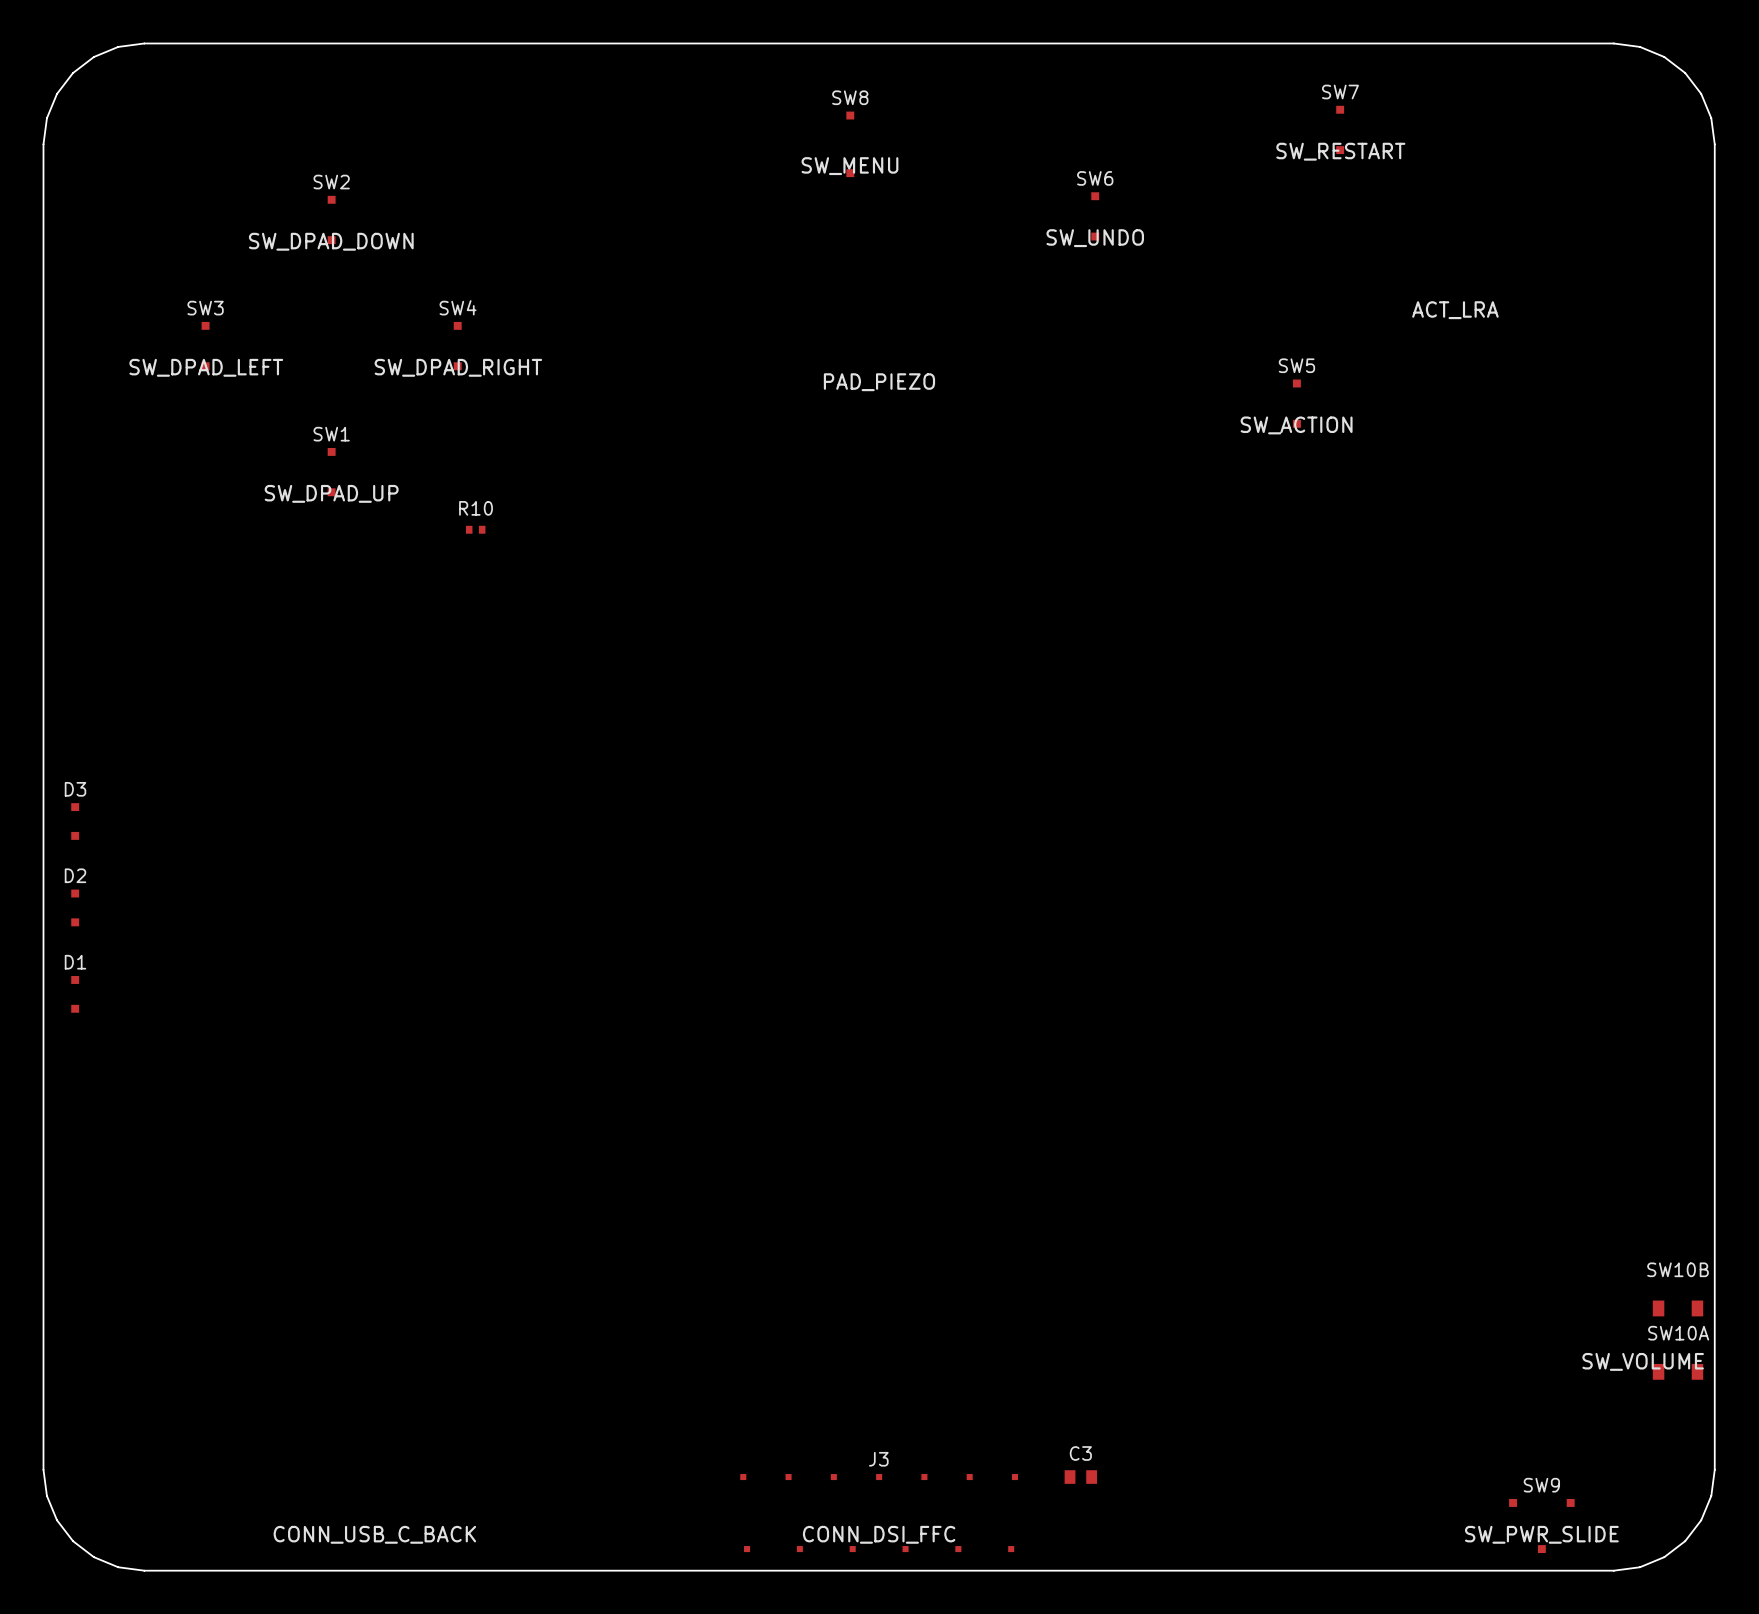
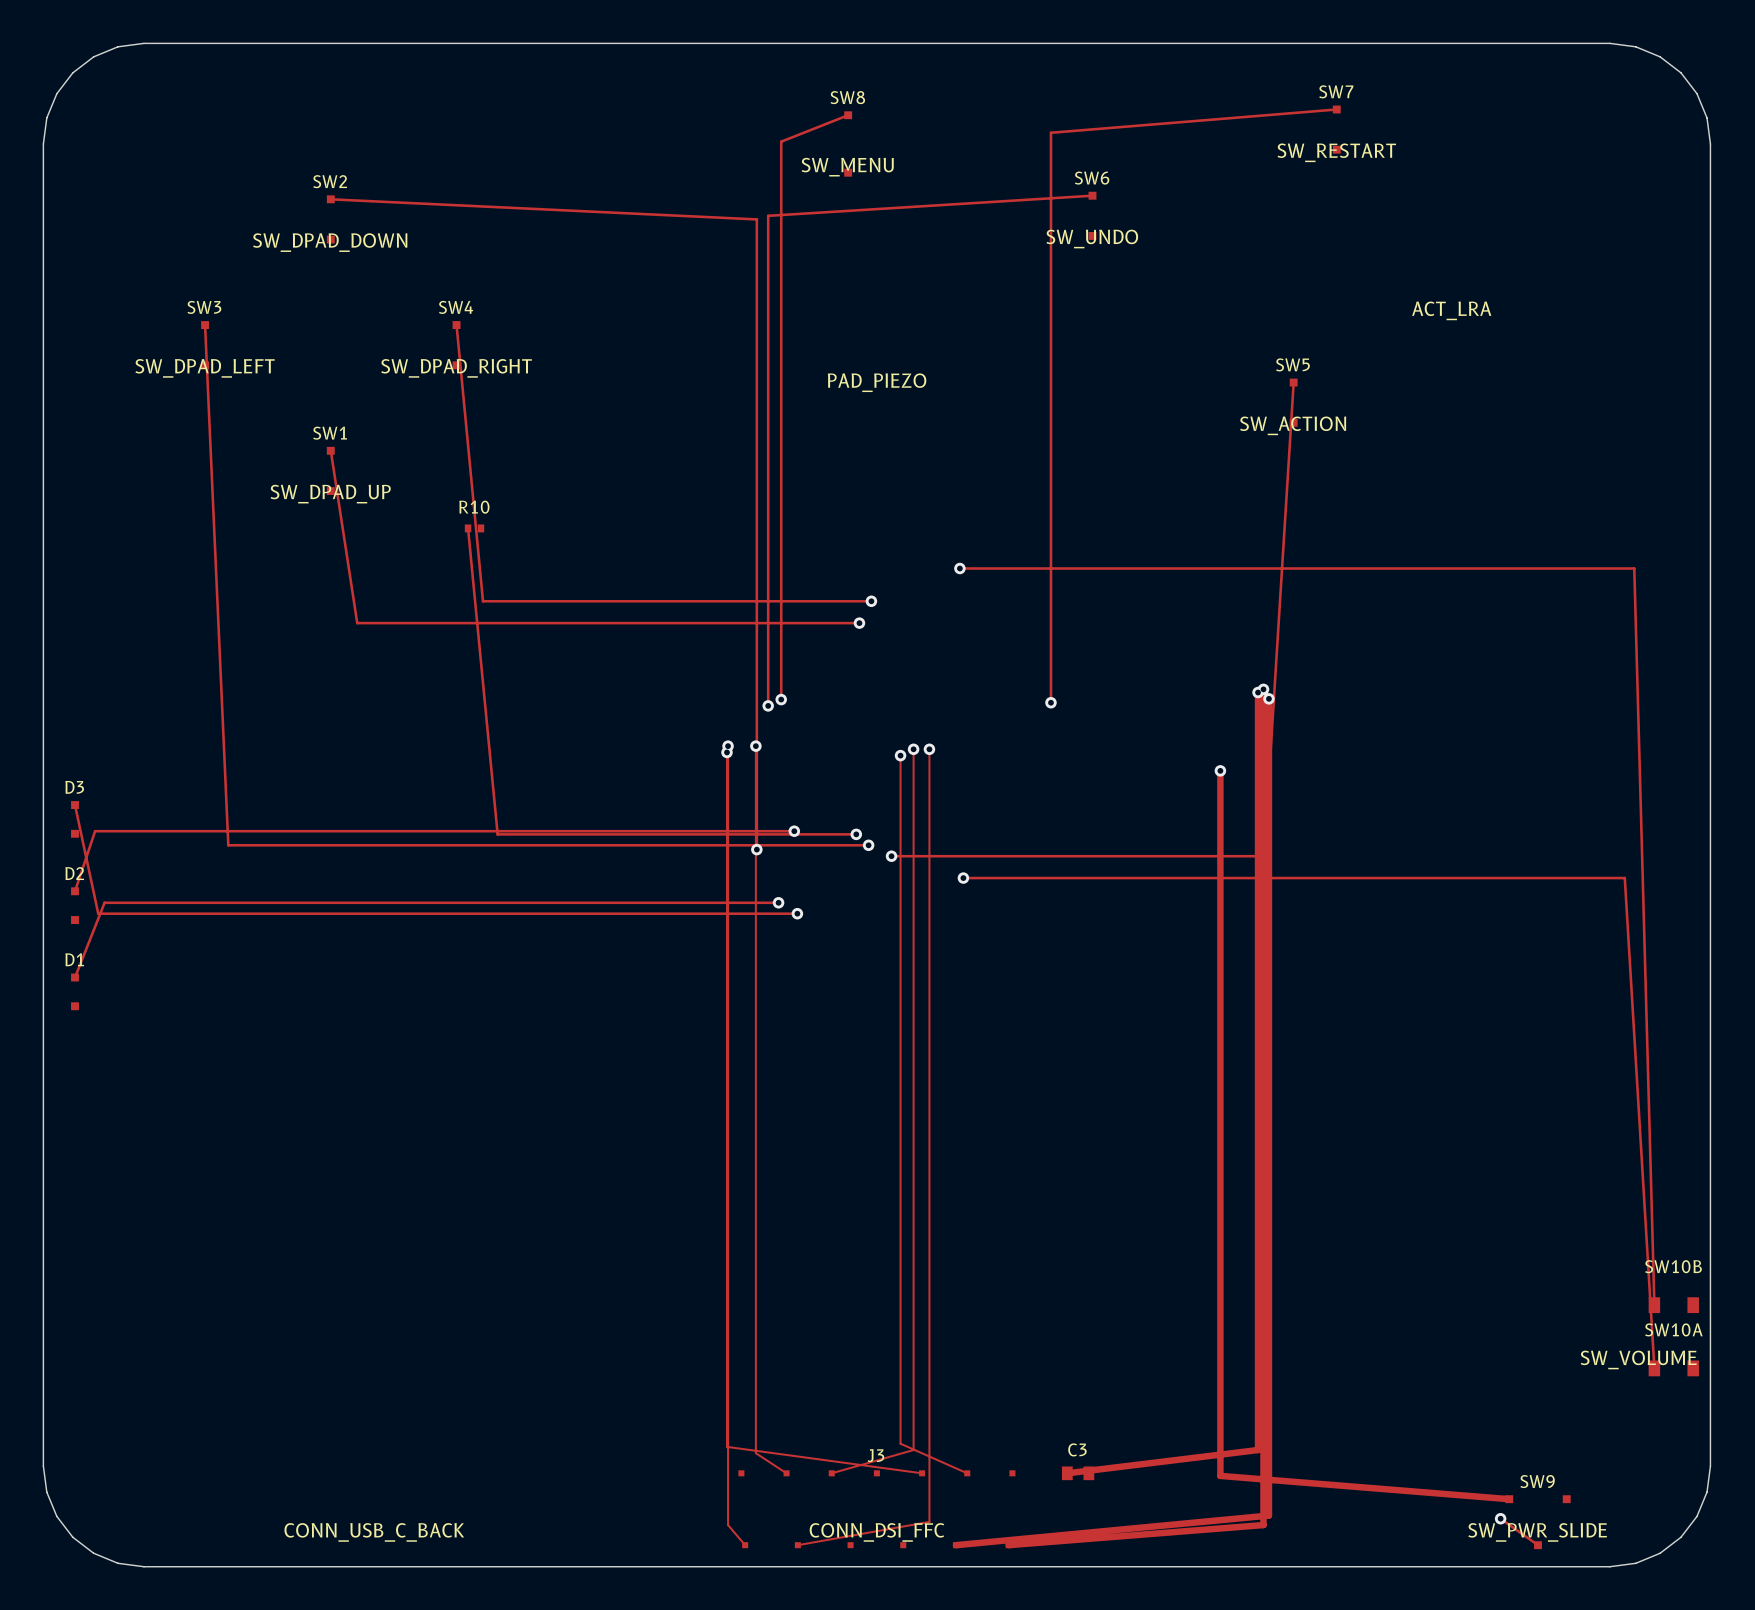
track: none -> (1336, 109) (1050, 132) (1050, 702)
track: none -> (848, 115) (781, 141) (781, 699)
track: none -> (1092, 195) (768, 215) (768, 705)
track: none -> (330, 199) (756, 219) (756, 849)
track: none -> (205, 325) (228, 845) (868, 845)
track: none -> (456, 325) (483, 601) (871, 601)
track: none -> (1293, 382) (1264, 856) (891, 856)
track: none -> (330, 450) (357, 623) (859, 623)
track: none -> (468, 528) (497, 834) (856, 834)
track: none -> (959, 568) (1634, 568) (1654, 1305)
via: none -> (959, 568)
via: none -> (871, 601)
via: none -> (859, 623)
track: none -> (1263, 689) (1263, 1525) (1008, 1545)
via: none -> (1263, 689)
track: none -> (1258, 692) (1258, 1450) (1067, 1473)
via: none -> (1258, 692)
track: none -> (1268, 698) (1268, 1515) (955, 1545)
via: none -> (1268, 698)
via: none -> (781, 699)
via: none -> (1050, 702)
via: none -> (768, 705)
track: none -> (728, 746) (728, 1525) (745, 1545)
via: none -> (728, 746)
track: none -> (755, 746) (755, 1453) (786, 1473)
via: none -> (755, 746)
track: none -> (913, 749) (913, 1450) (831, 1473)
via: none -> (913, 749)
track: none -> (929, 749) (929, 1521) (797, 1545)
via: none -> (929, 749)
track: none -> (726, 752) (726, 1446) (922, 1473)
via: none -> (726, 752)
track: none -> (900, 755) (900, 1443) (967, 1473)
via: none -> (900, 755)
track: none -> (1220, 770) (1220, 1475) (1509, 1499)
via: none -> (1220, 770)
track: none -> (75, 805) (98, 913) (797, 913)
track: none -> (794, 831) (95, 831) (75, 891)
via: none -> (794, 831)
via: none -> (856, 834)
via: none -> (868, 845)
via: none -> (756, 849)
via: none -> (891, 856)
track: none -> (963, 878) (1624, 878) (1654, 1368)
via: none -> (963, 878)
track: none -> (778, 902) (104, 902) (75, 977)
via: none -> (778, 902)
via: none -> (797, 913)
track: none -> (1500, 1518) (1537, 1545)
via: none -> (1500, 1518)

